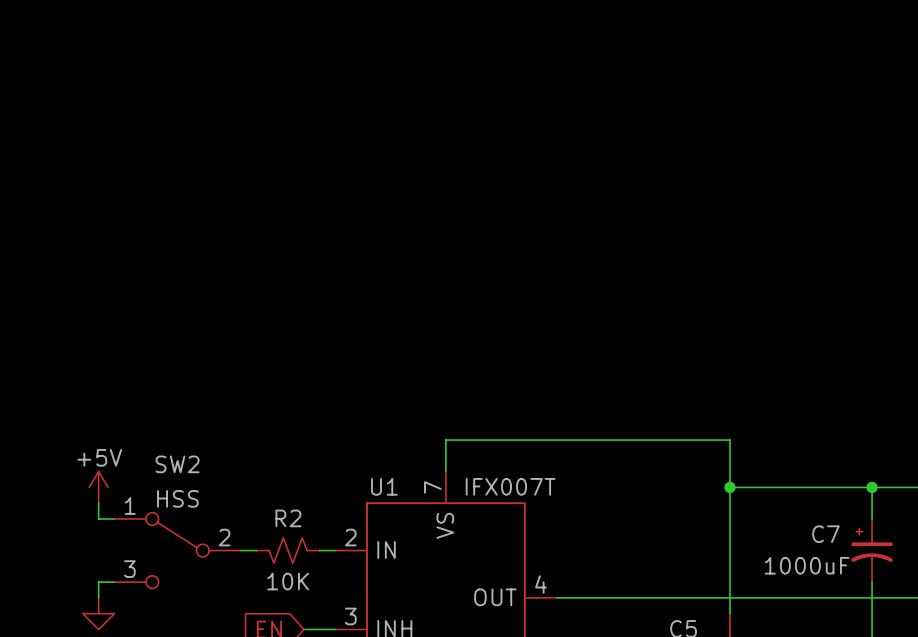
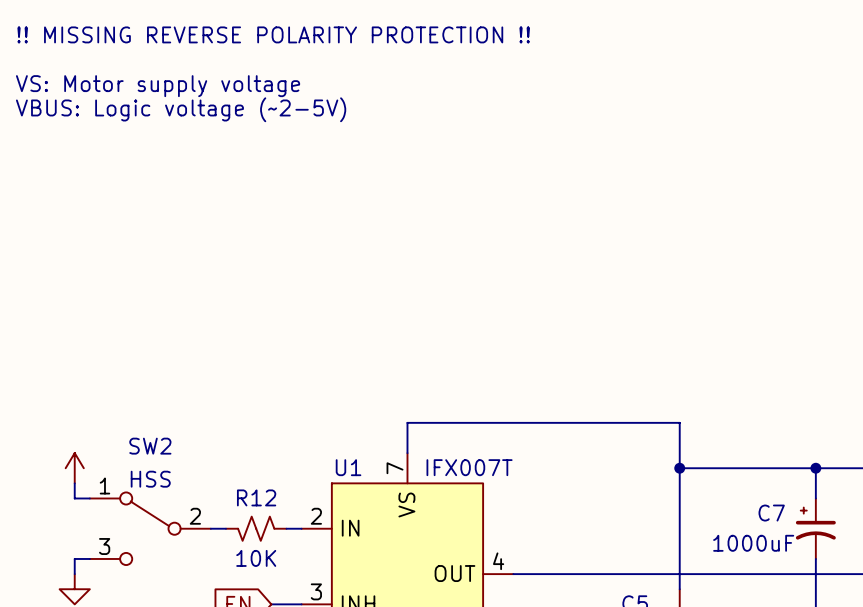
text: none -> !! MISSING REVERSE POLARITY PROTECTION !! (273, 34)
text: none -> VS: Motor supply voltage (158, 86)
text: none -> VBUS: Logic voltage (~2-5V) (181, 109)
power symbol text: +5V (99, 457) -> none
R2 name: R2 (288, 518) -> R12 (256, 497)

